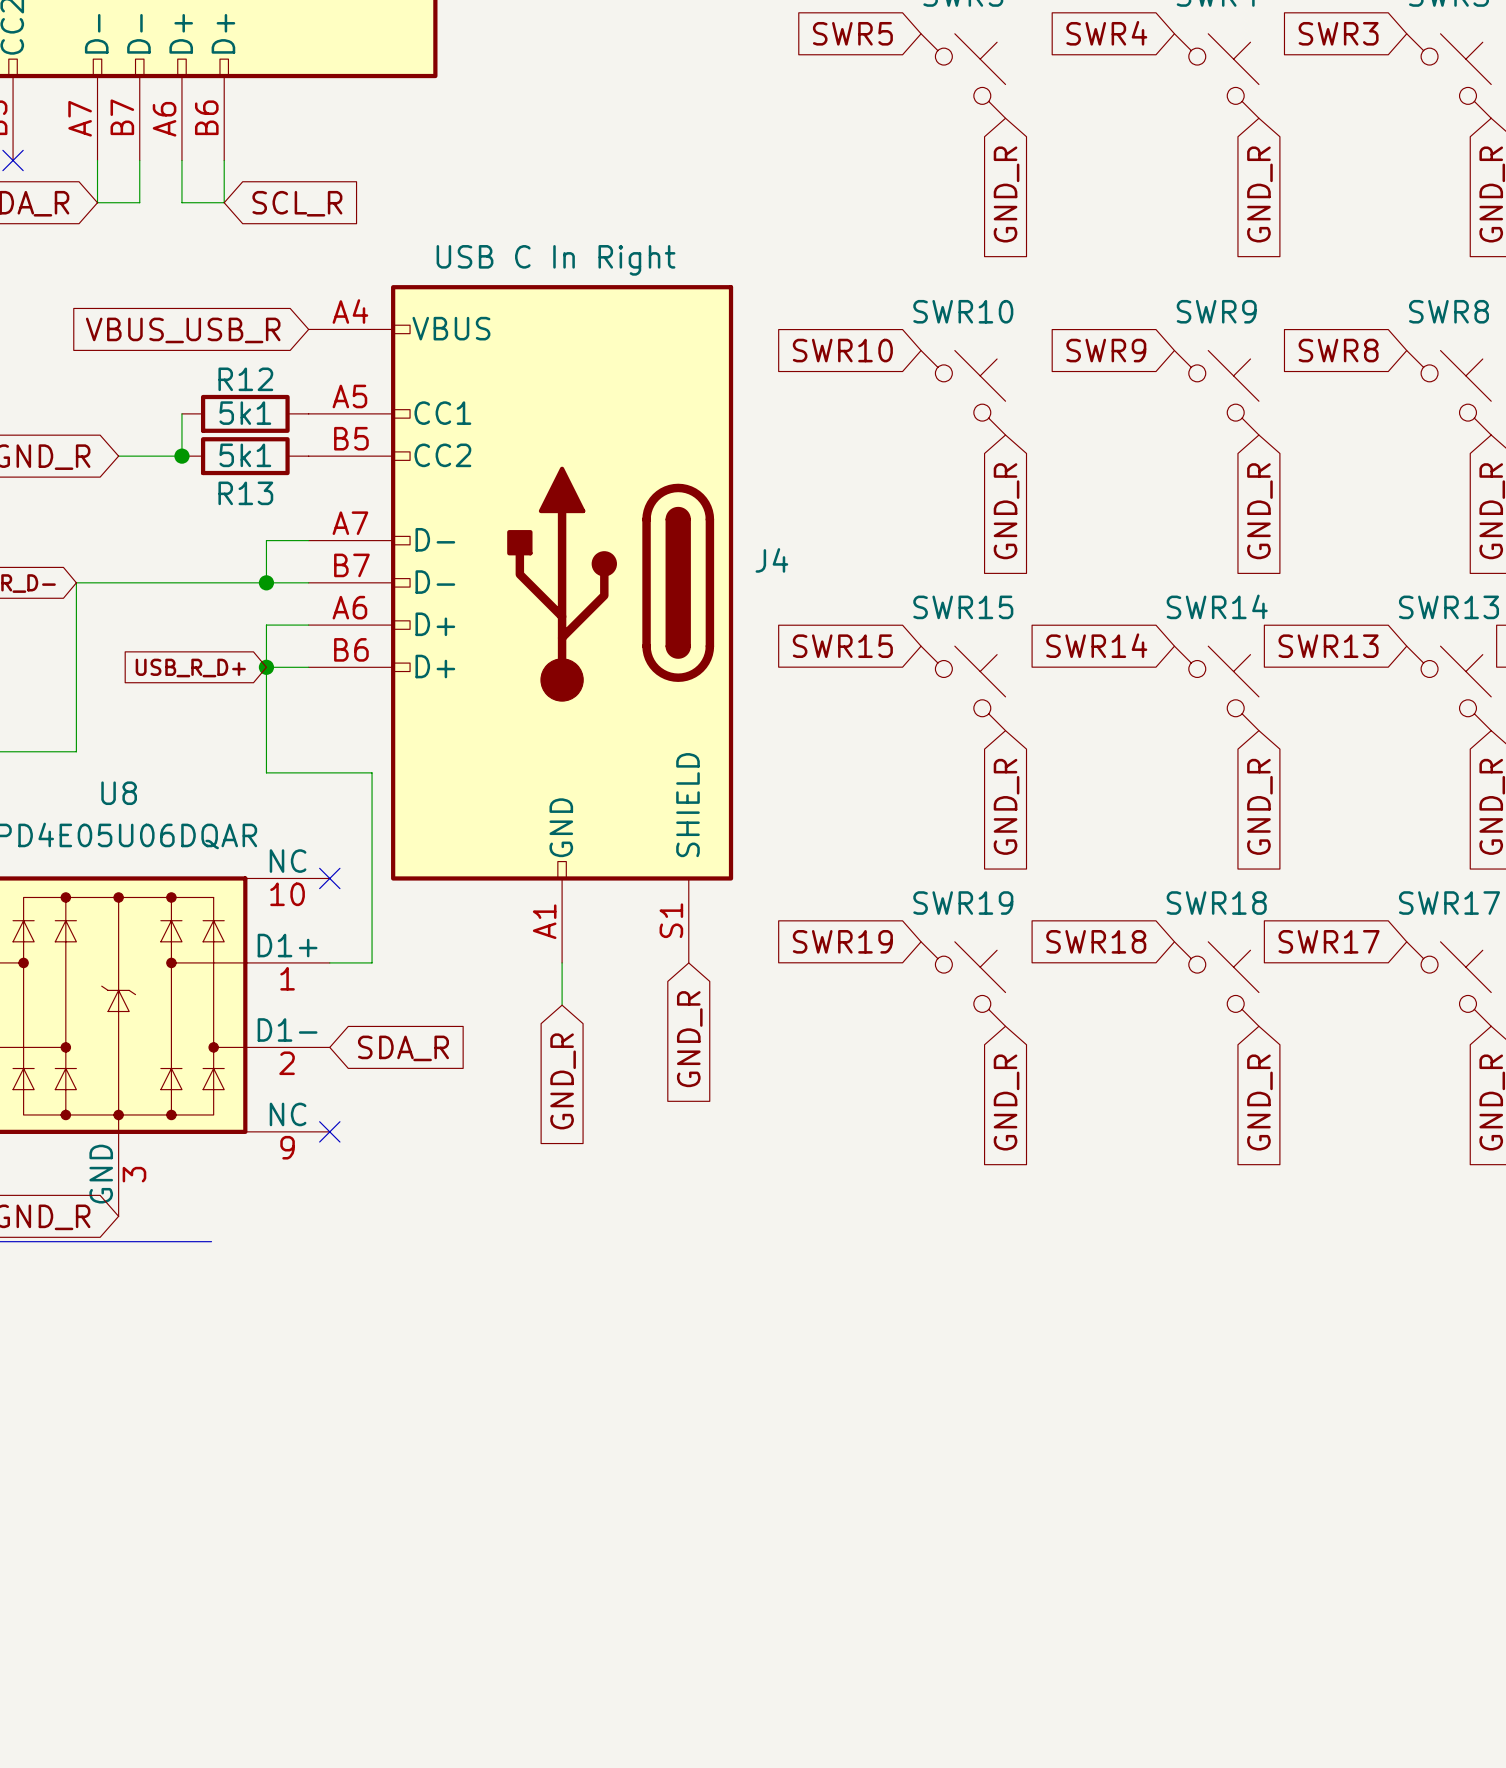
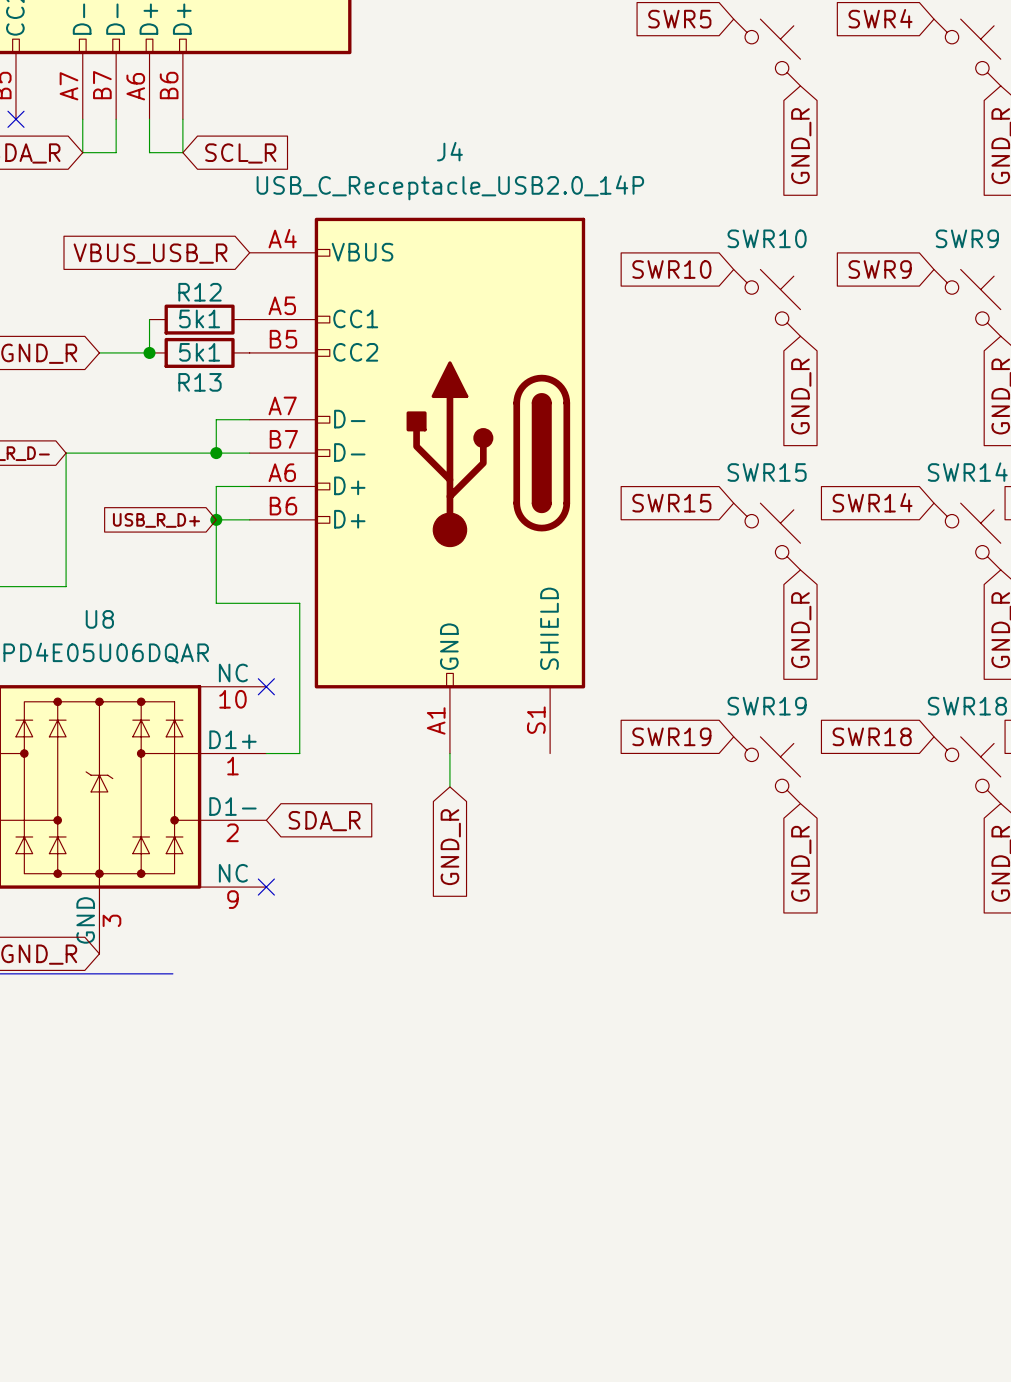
J4 value: USB C In Right (556, 260) -> USB_C_Receptacle_USB2.0_14P (450, 187)
J4 name position: J4 (771, 560) -> J4 (449, 151)
global label: GND_R (689, 1039) -> none

